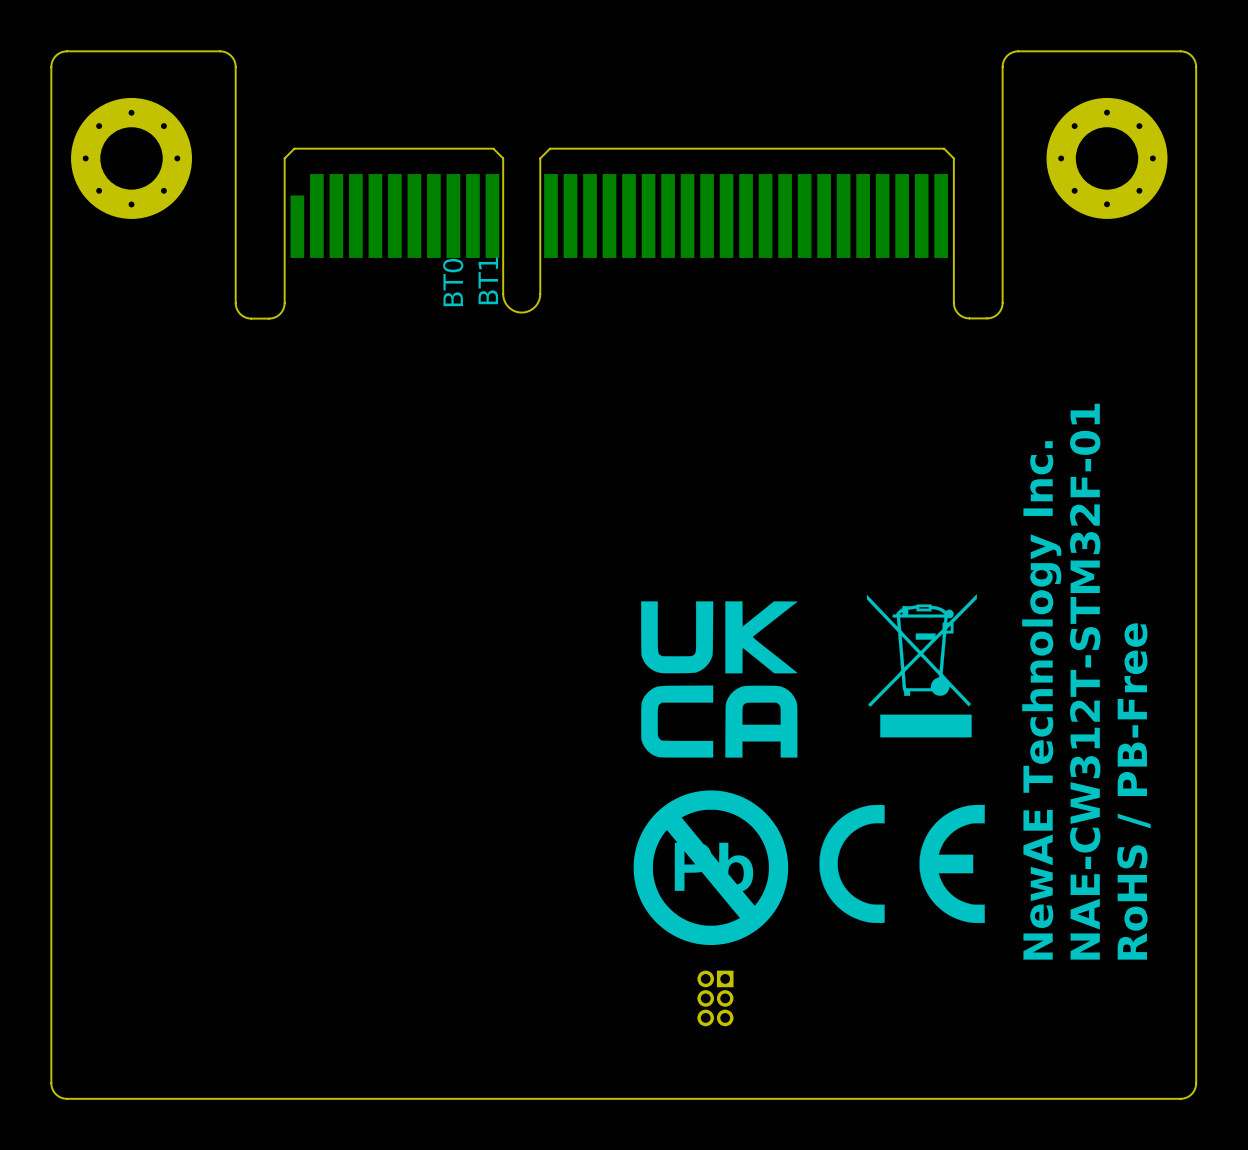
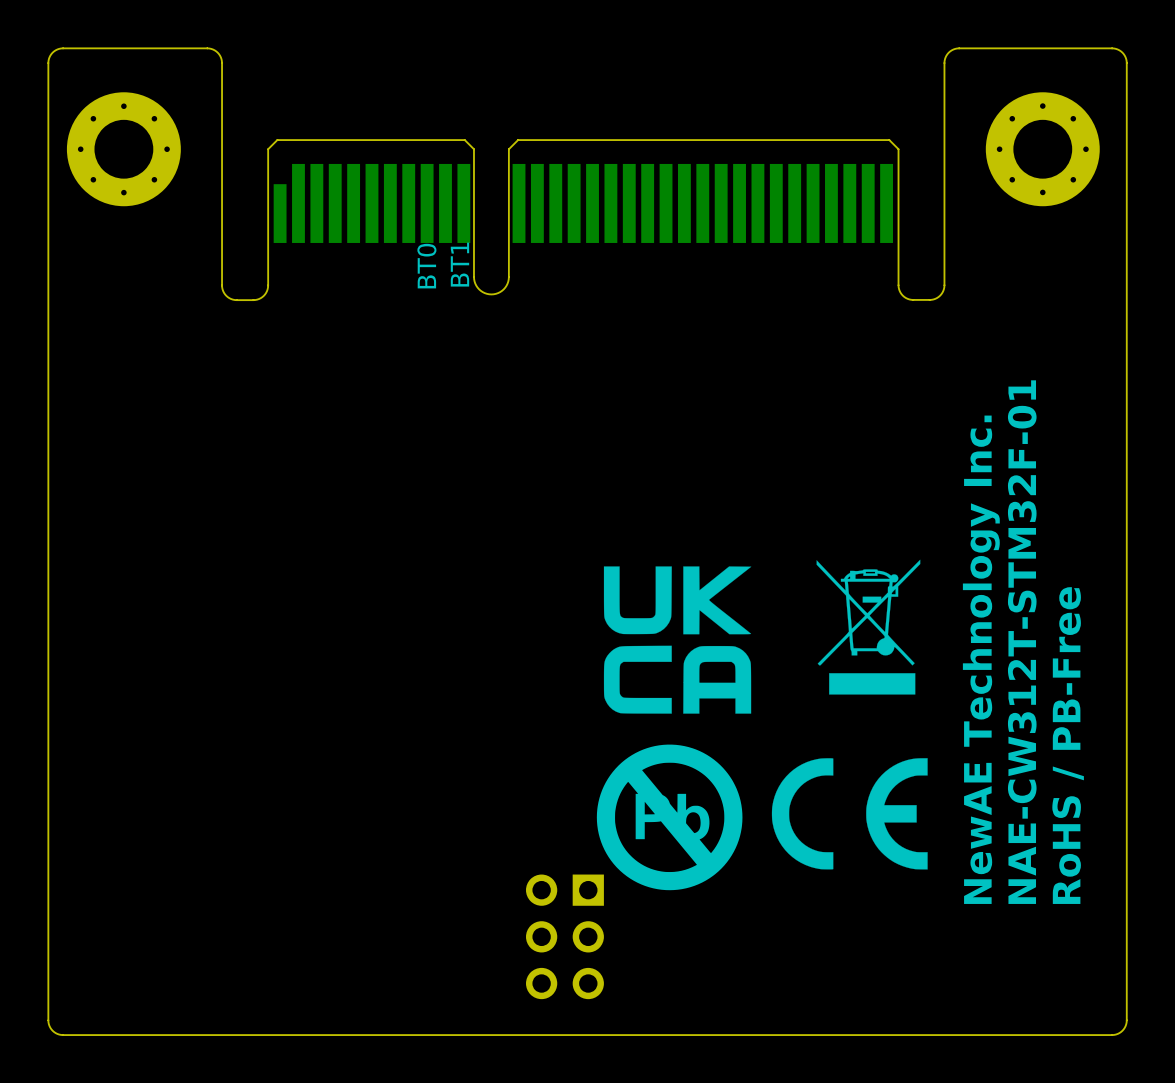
part: none -> (564, 936)
part: (715, 998) -> none

